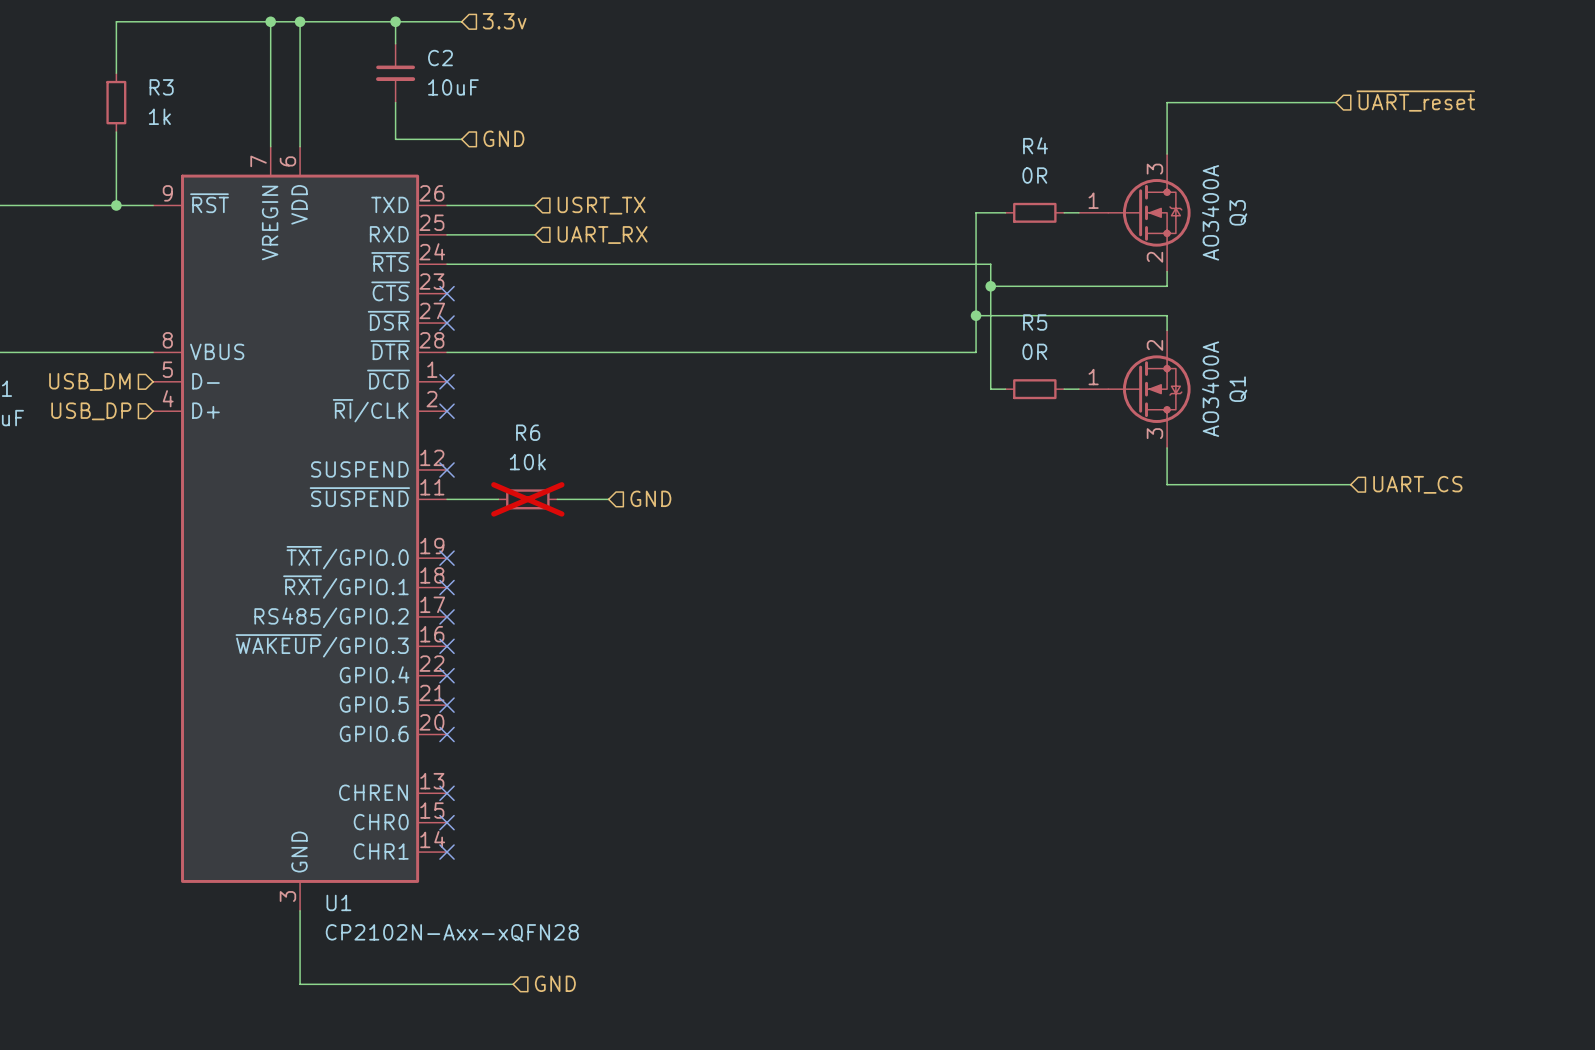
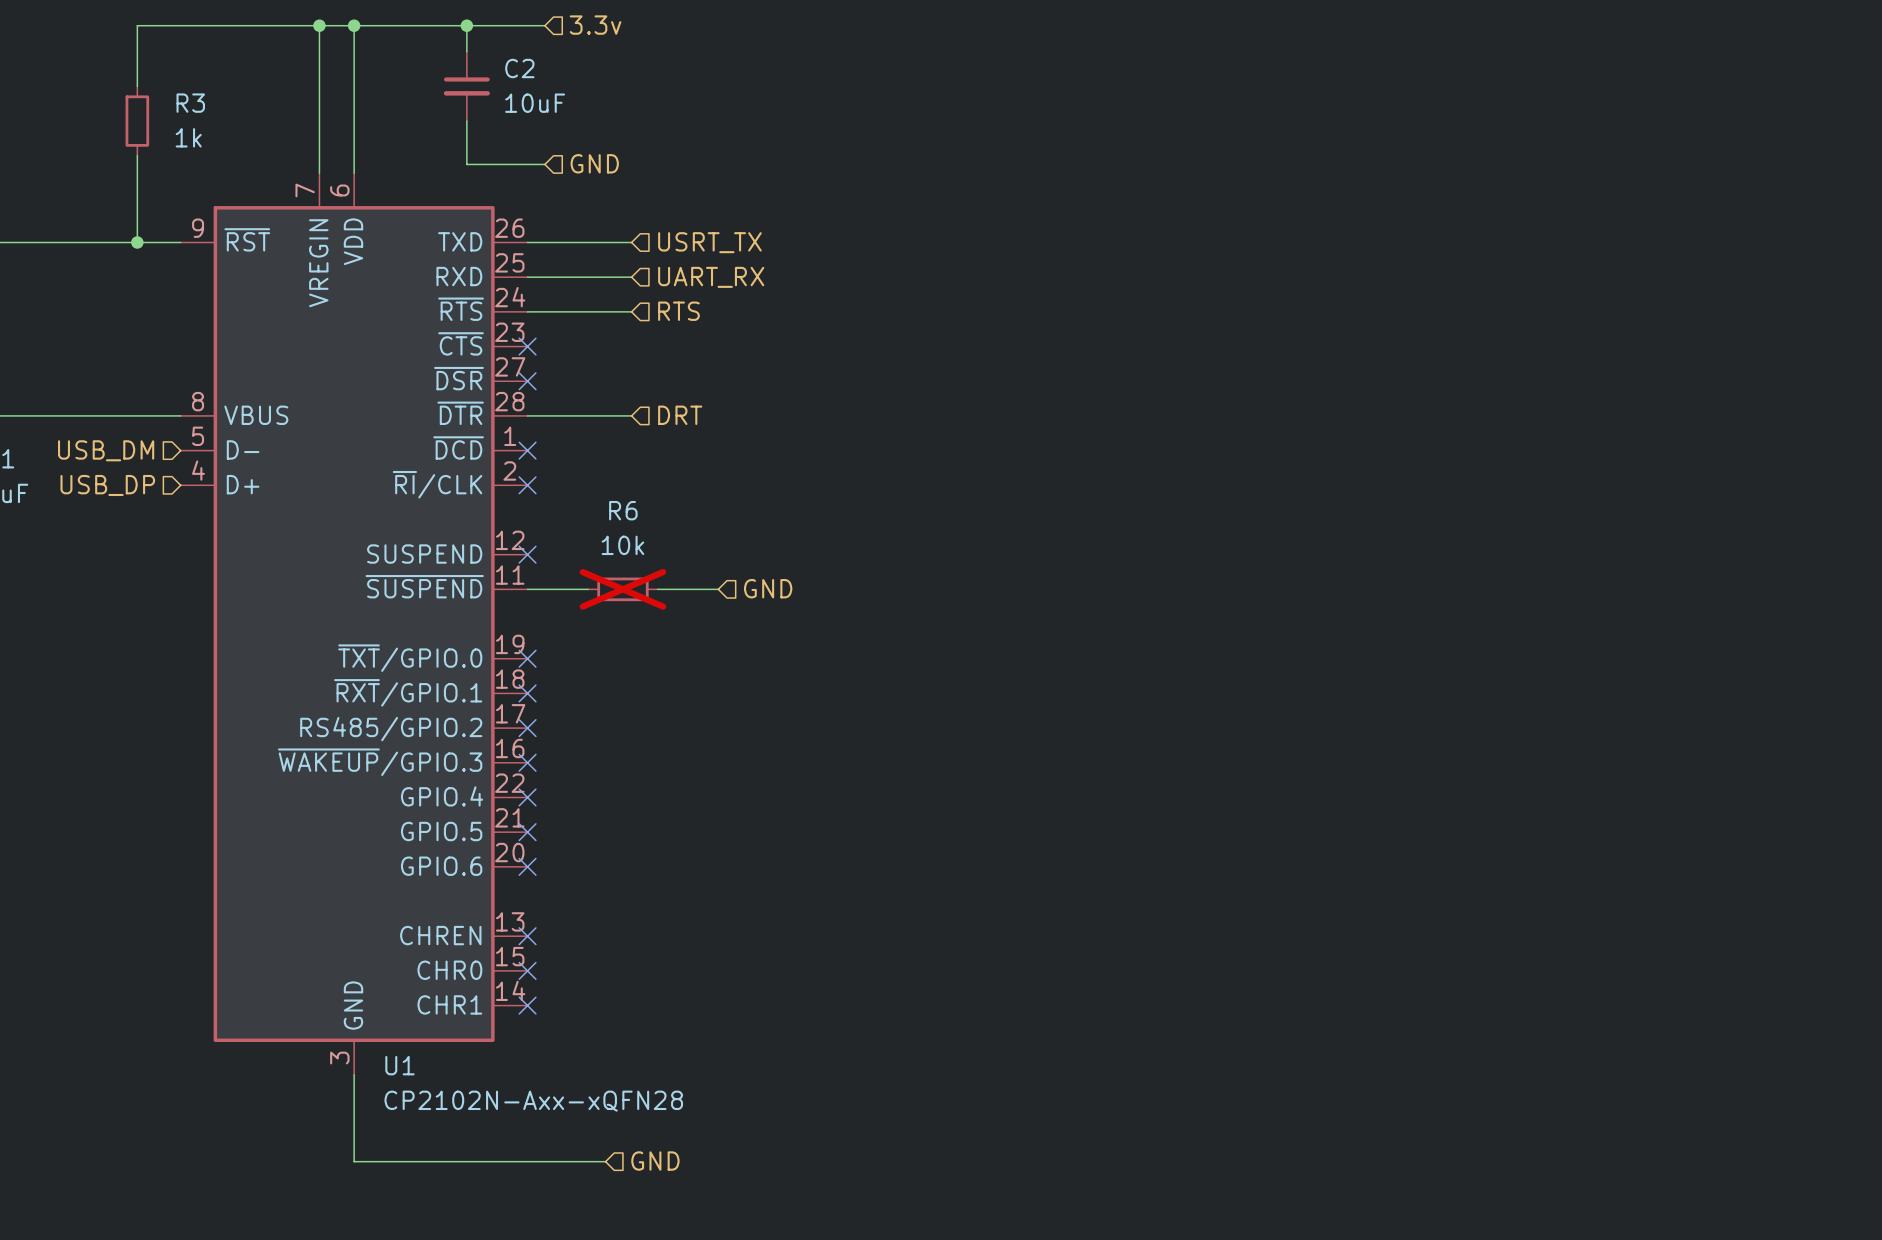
hierarchical label: ~{UART_reset} (1415, 101) -> none
wire: (1336, 102) (1167, 102) (1167, 154) -> none
wire: (1005, 212) (976, 212) (976, 352) (535, 352) -> none
R4: 0R (1034, 212) -> none
wire: (1064, 212) (1078, 212) -> none
Q3: AO3400A (1134, 212) -> none
hierarchical label: none -> RTS (678, 311)
wire: (535, 264) (990, 264) (990, 389) (1005, 389) -> none
wire: (1167, 271) (1167, 286) (990, 286) -> none
junction: (990, 286) -> none
wire: (976, 315) (1167, 315) (1167, 330) -> none
junction: (976, 315) -> none
hierarchical label: none -> DRT (680, 415)
R5: 0R (1034, 389) -> none
wire: (1064, 389) (1078, 389) -> none
Q1: AO3400A (1134, 389) -> none
wire: (1167, 447) (1167, 484) (1350, 484) -> none
hierarchical label: UART_CS (1417, 484) -> none

